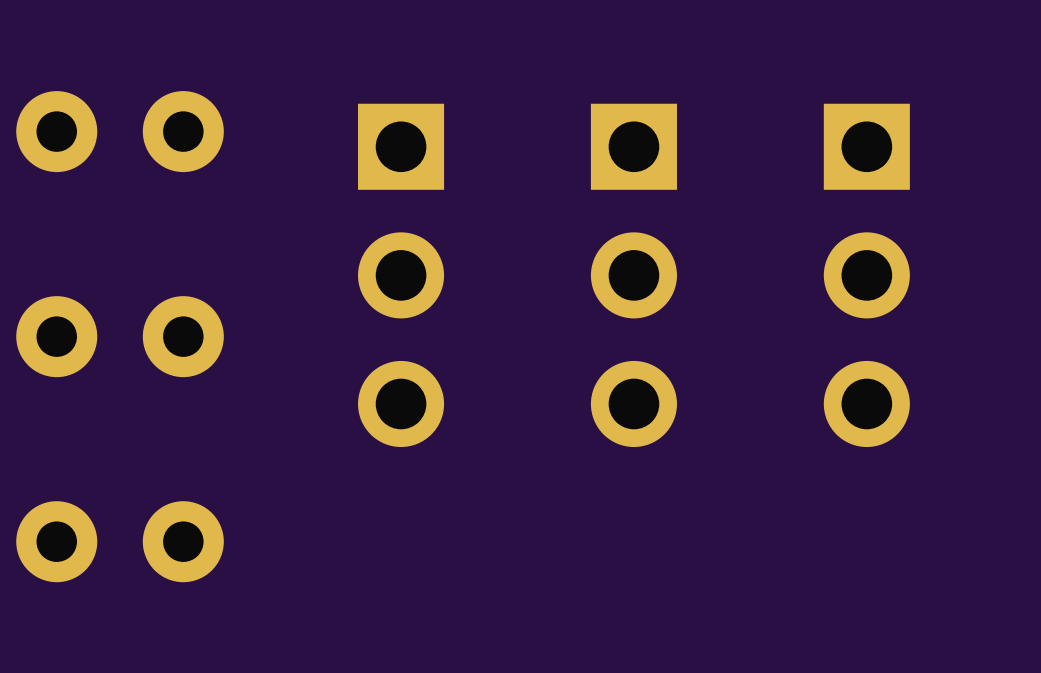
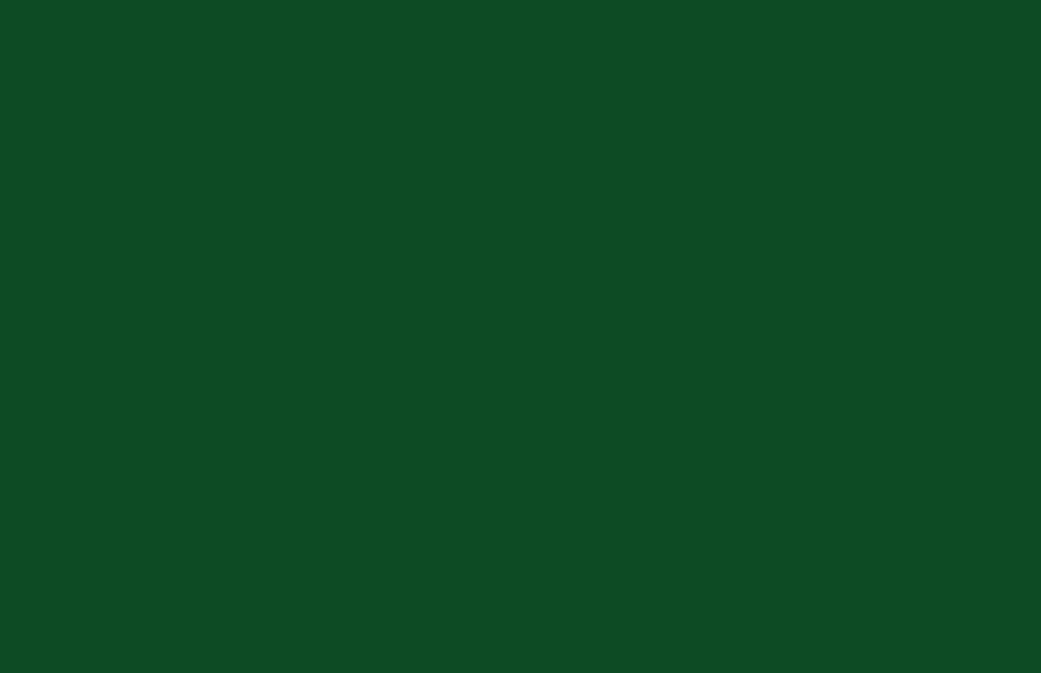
part: (120, 131) -> none
part: (401, 275) -> none
part: (633, 275) -> none
part: (866, 275) -> none
part: (120, 336) -> none
part: (120, 541) -> none

